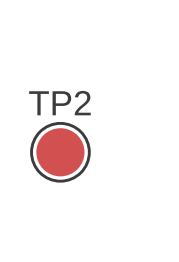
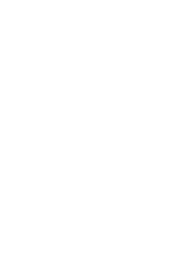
TP2: (60, 152) -> none

